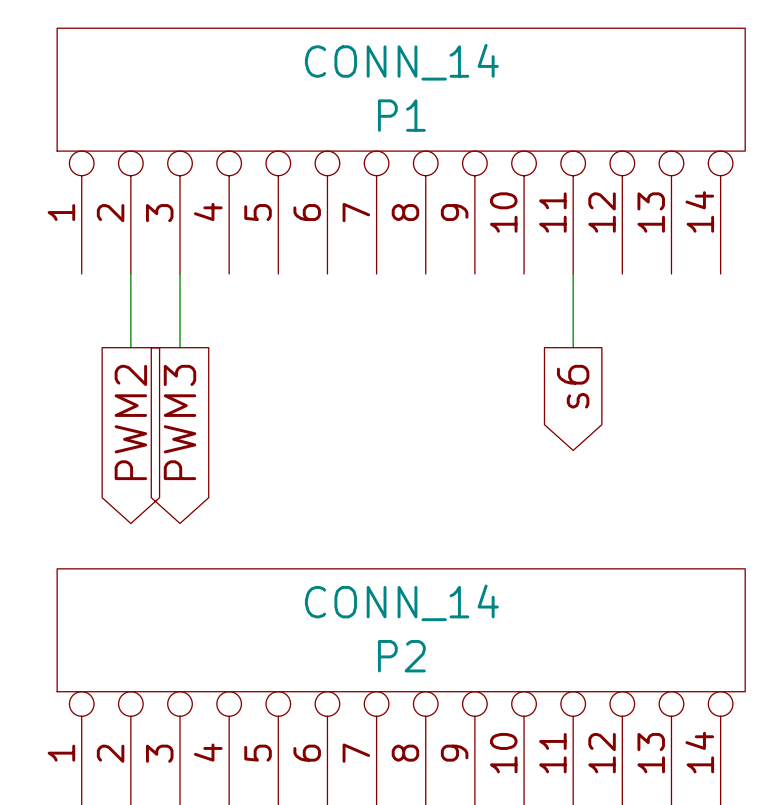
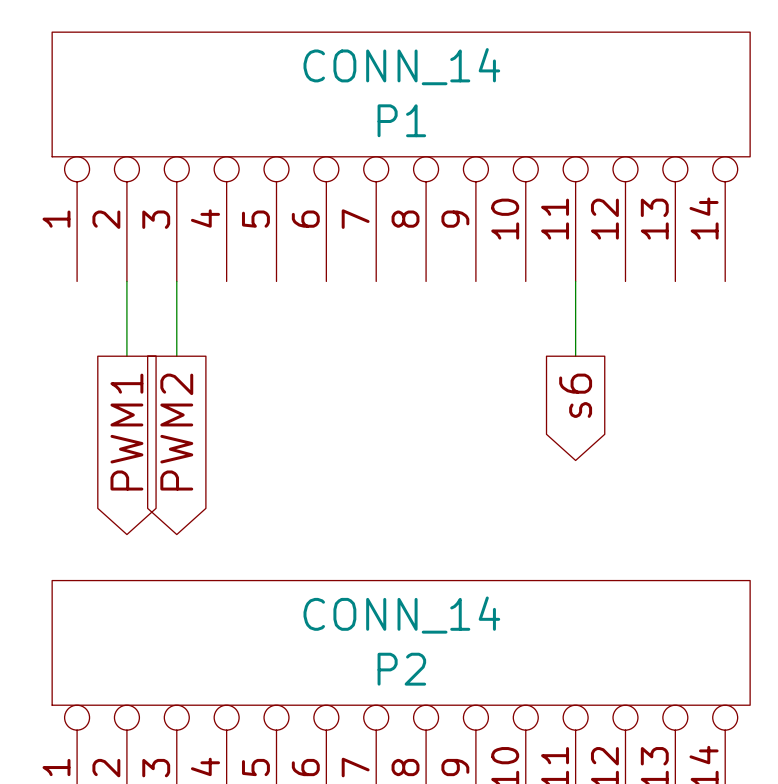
global label: PWM2 (130, 422) -> PWM1 (126, 432)
global label: PWM3 (180, 422) -> PWM2 (176, 432)

